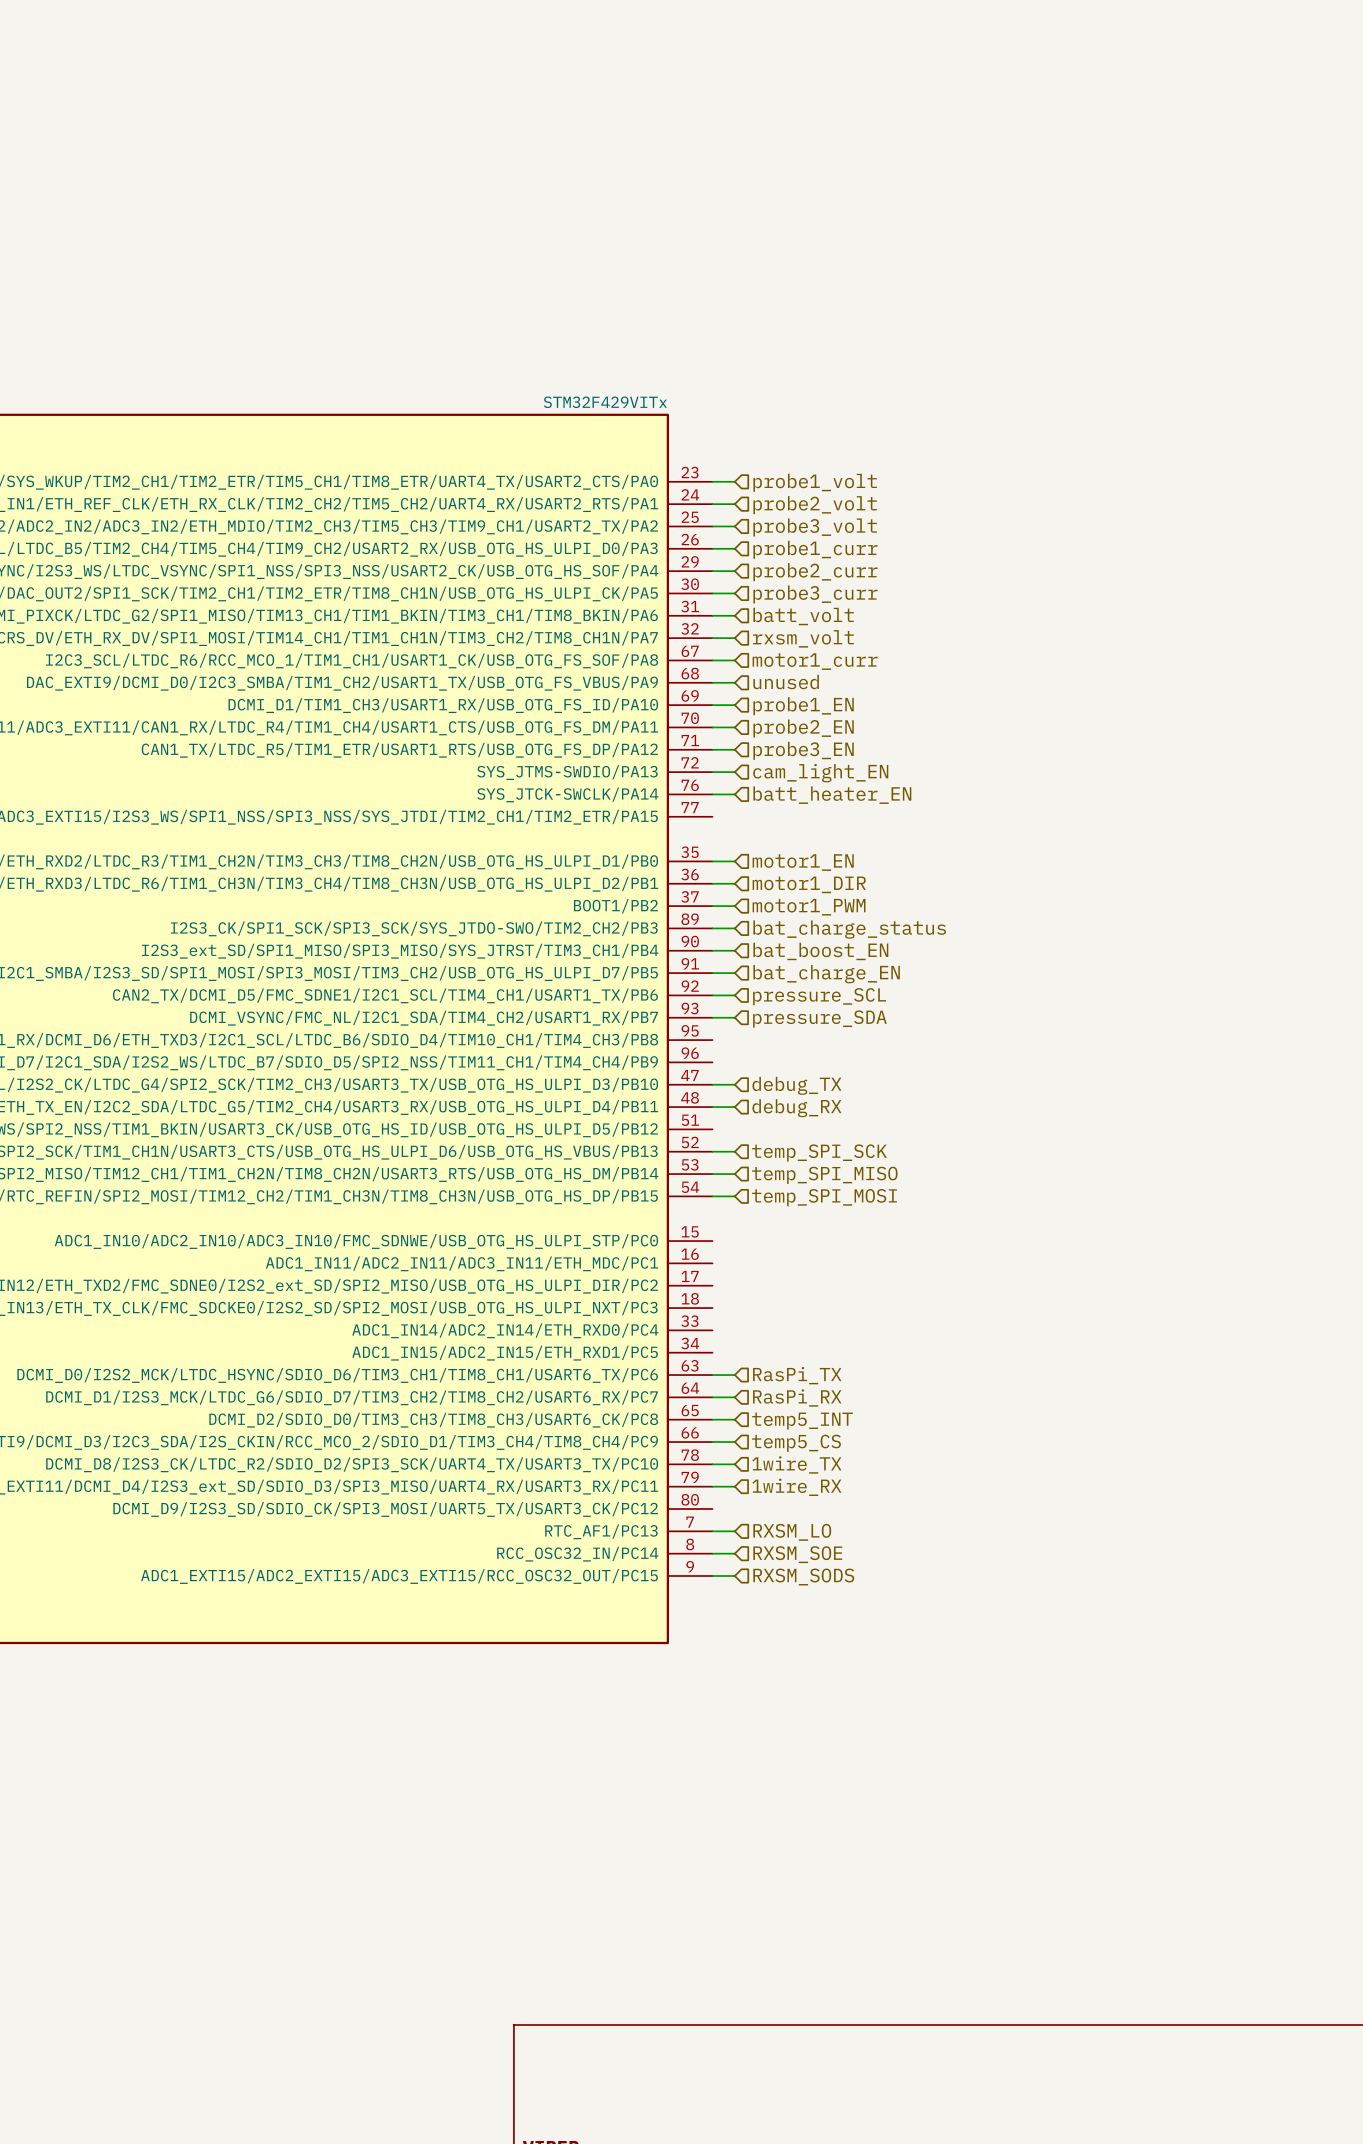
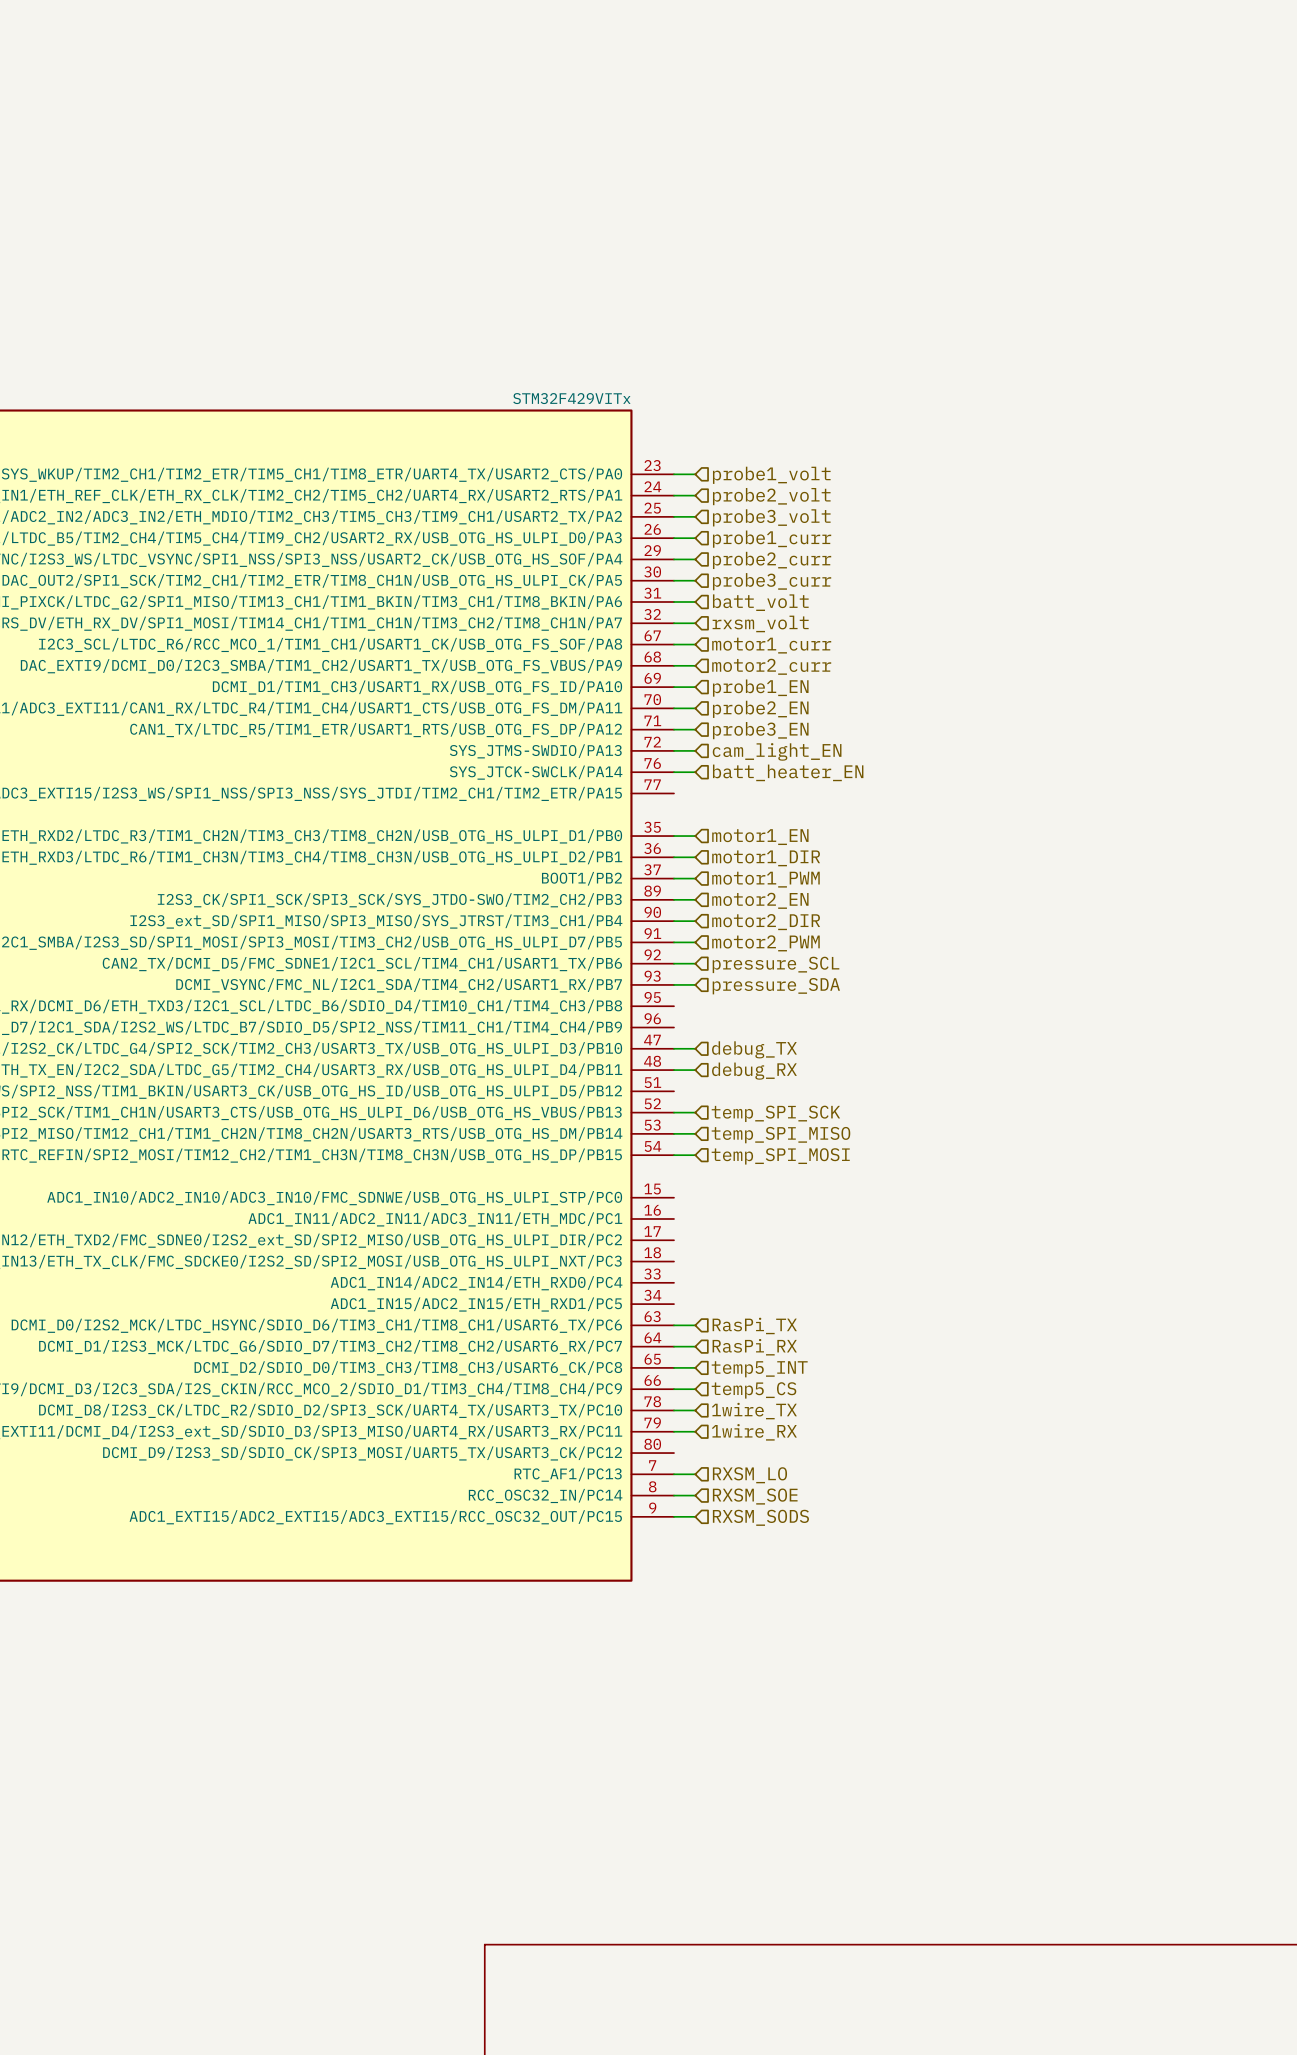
hierarchical label: unused (786, 681) -> motor2_curr (771, 666)
hierarchical label: bat_charge_status (849, 929) -> motor2_EN (760, 900)
hierarchical label: bat_boost_EN (820, 951) -> motor2_DIR (766, 922)
hierarchical label: bat_charge_EN (826, 974) -> motor2_PWM (765, 943)

